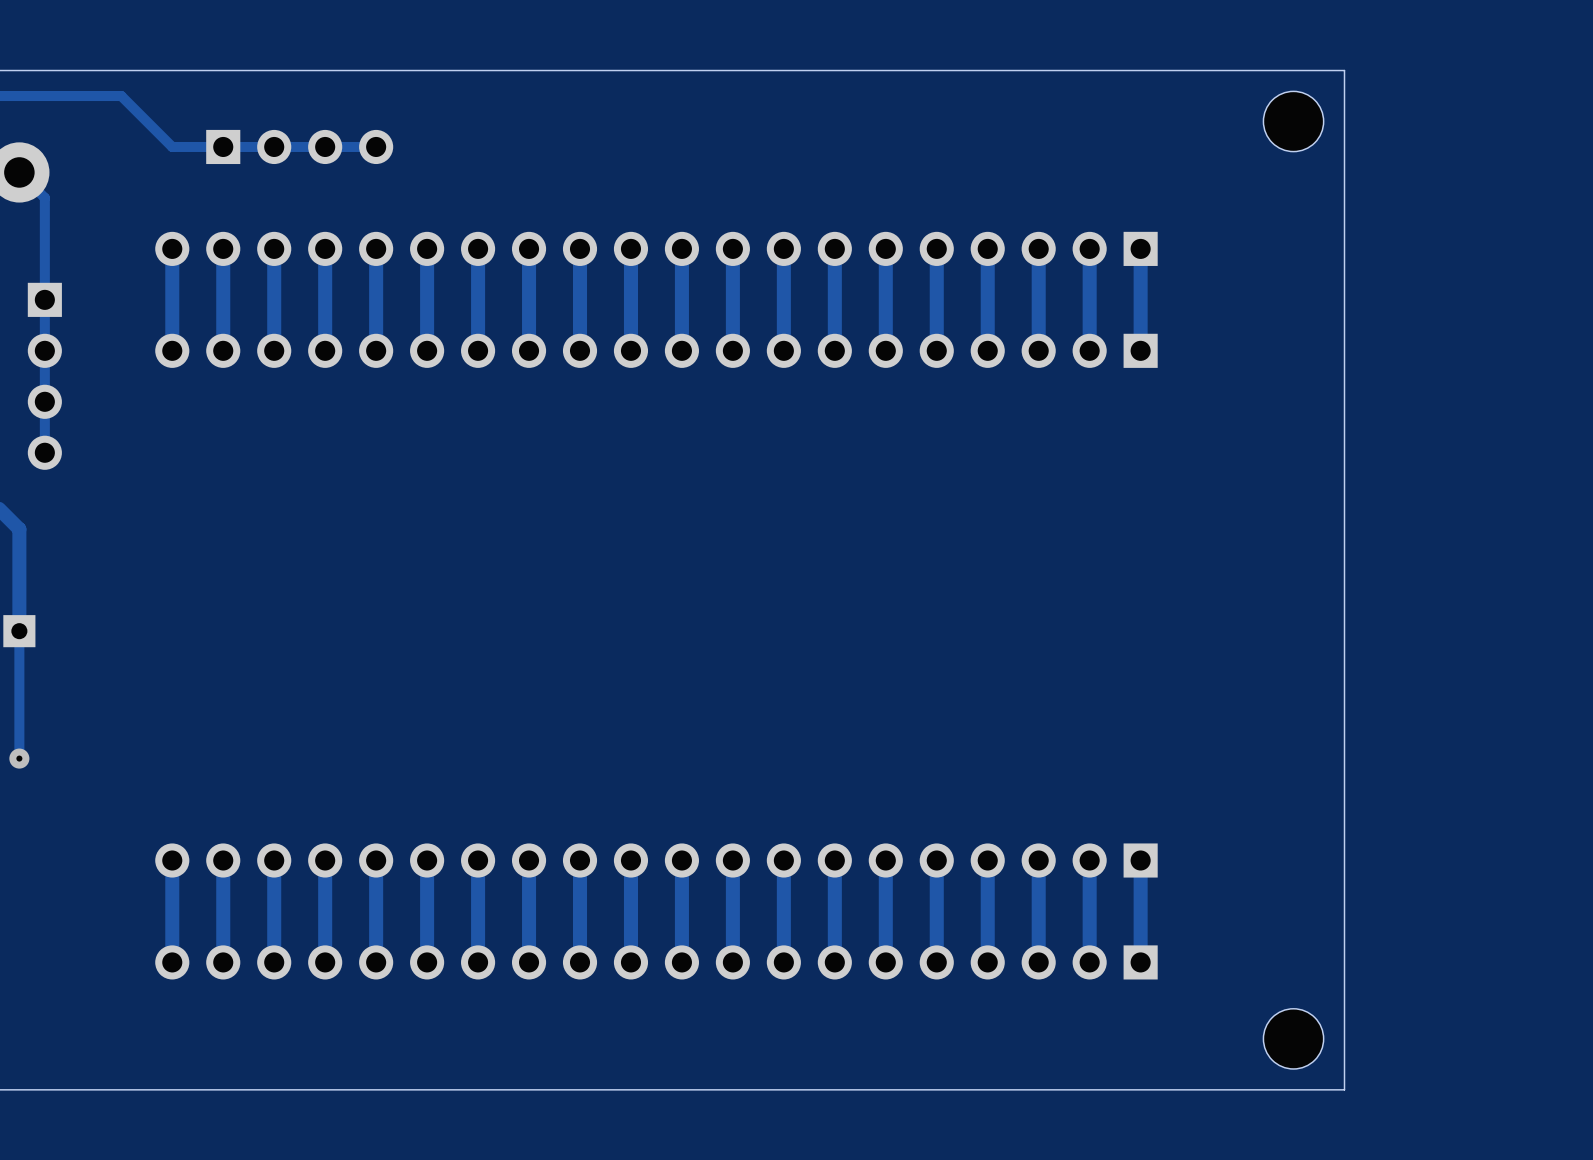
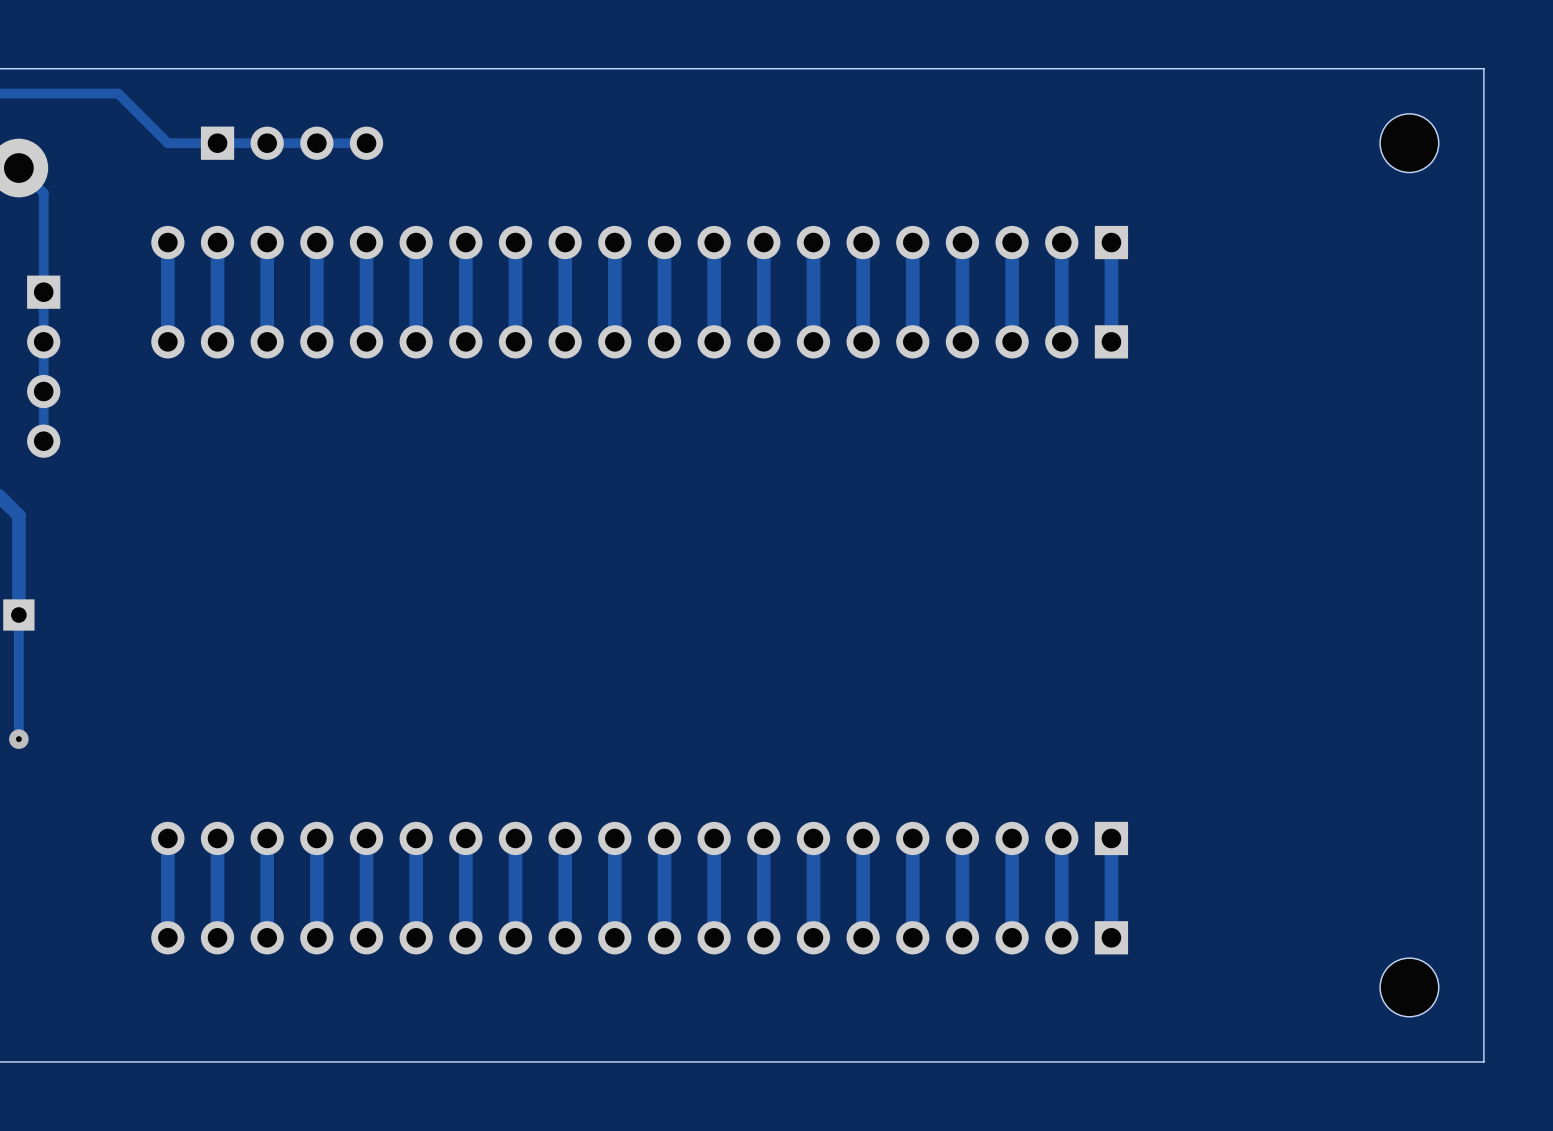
board edge: (1344, 70) (1344, 1089) -> (1310, 68) (1483, 68) (1483, 1061) (1310, 1061)
part position: (1293, 121) -> (1409, 143)
part position: (1293, 1038) -> (1409, 987)

